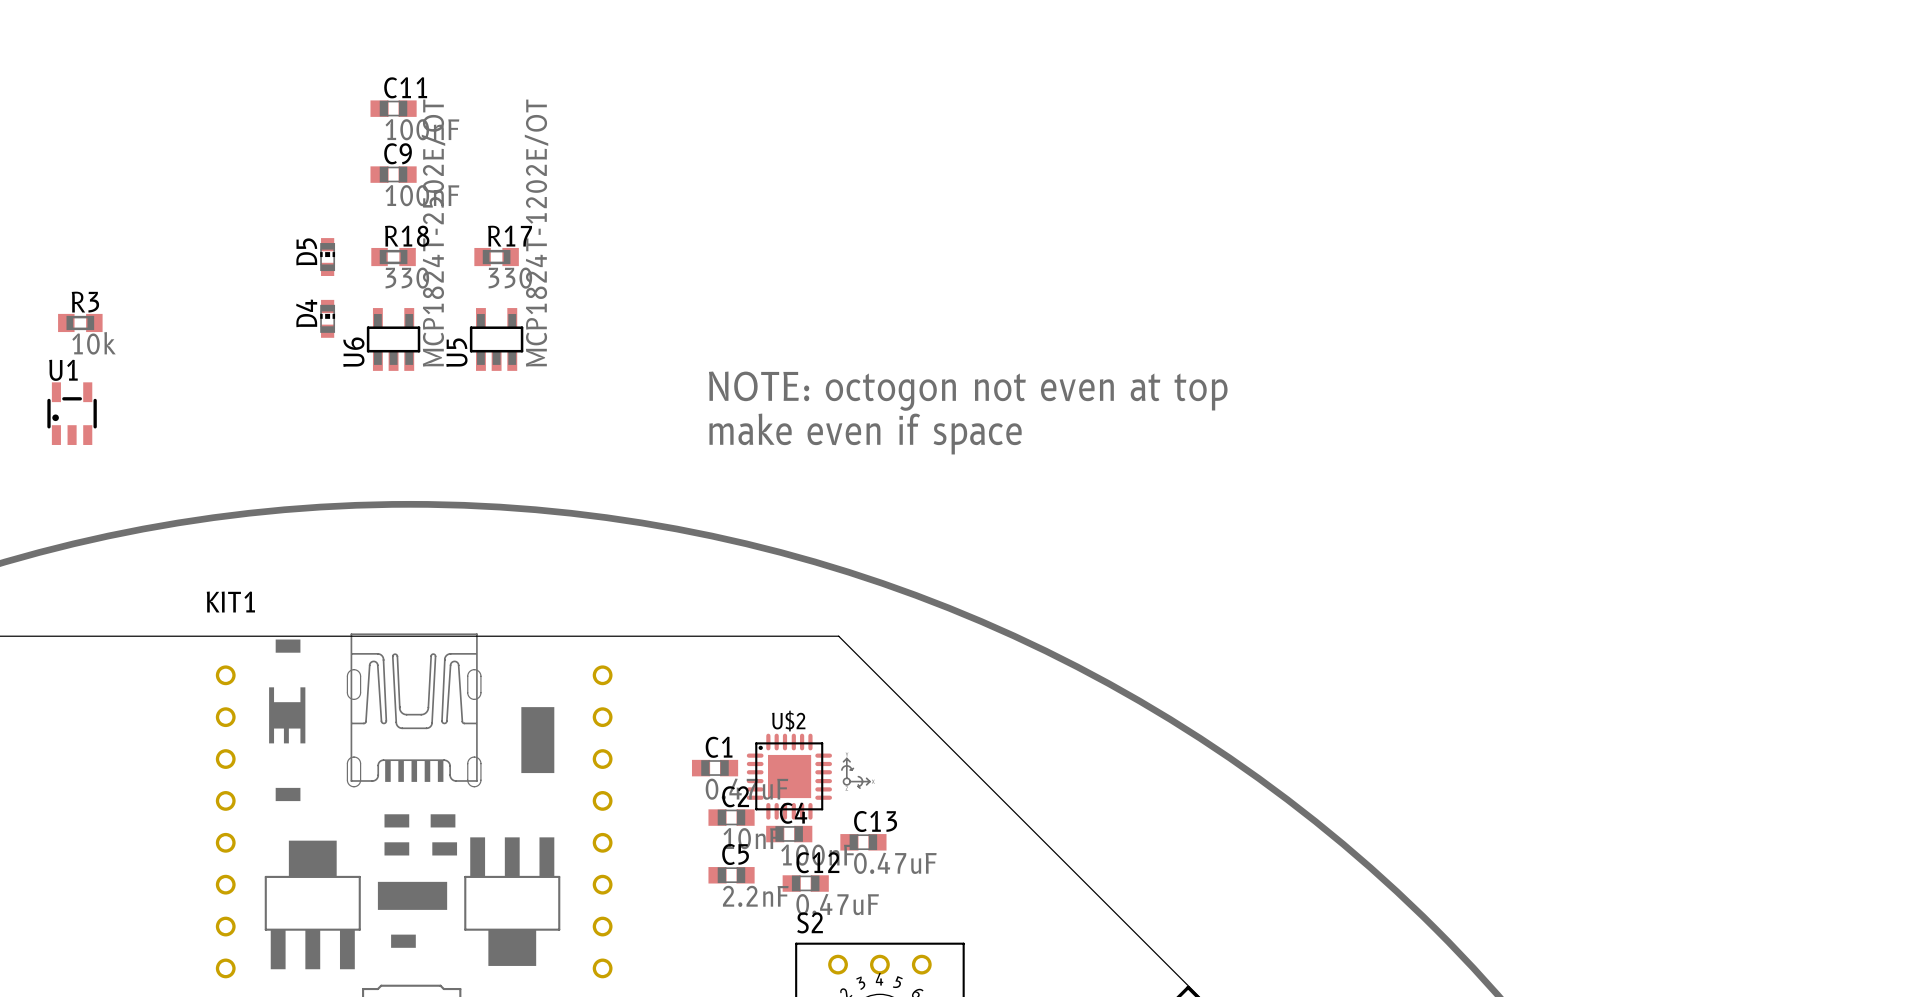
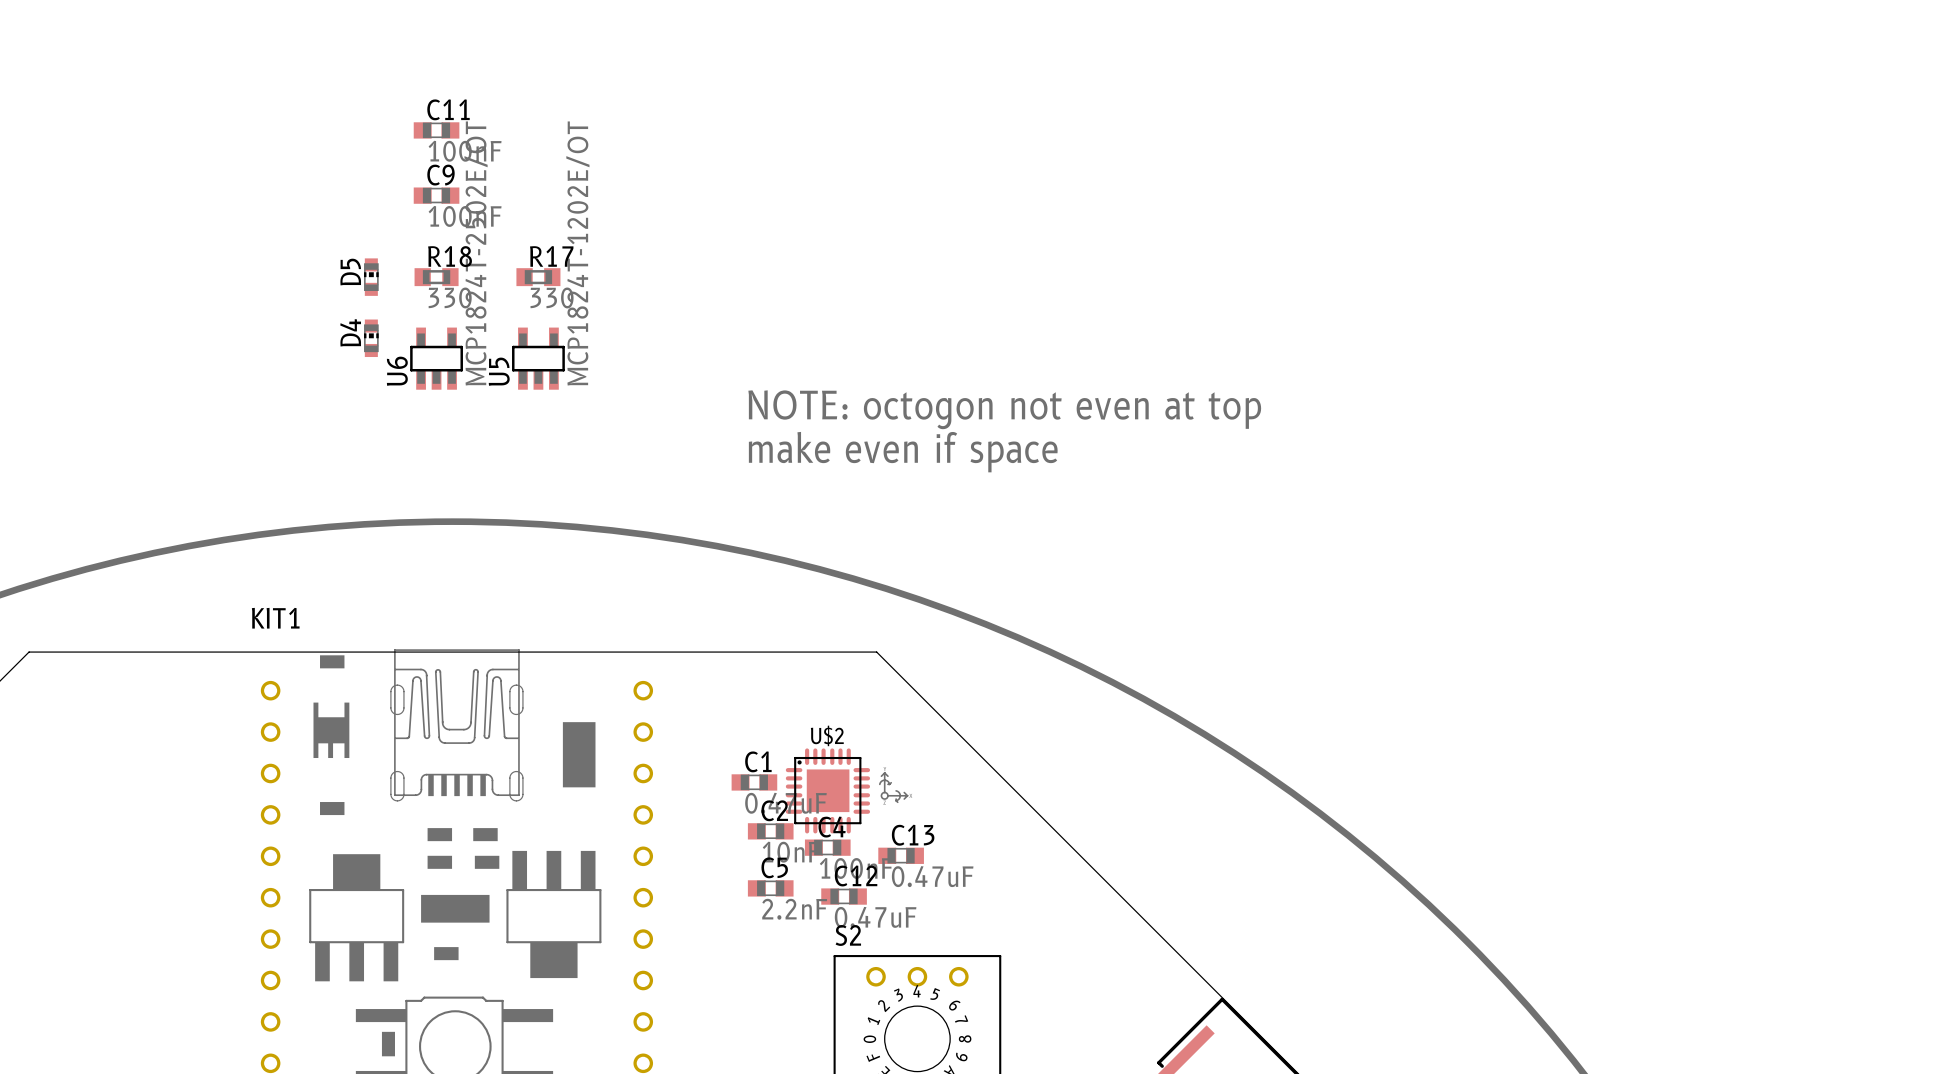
R3: 10k (80, 322) -> none
U1: (72, 413) -> none

